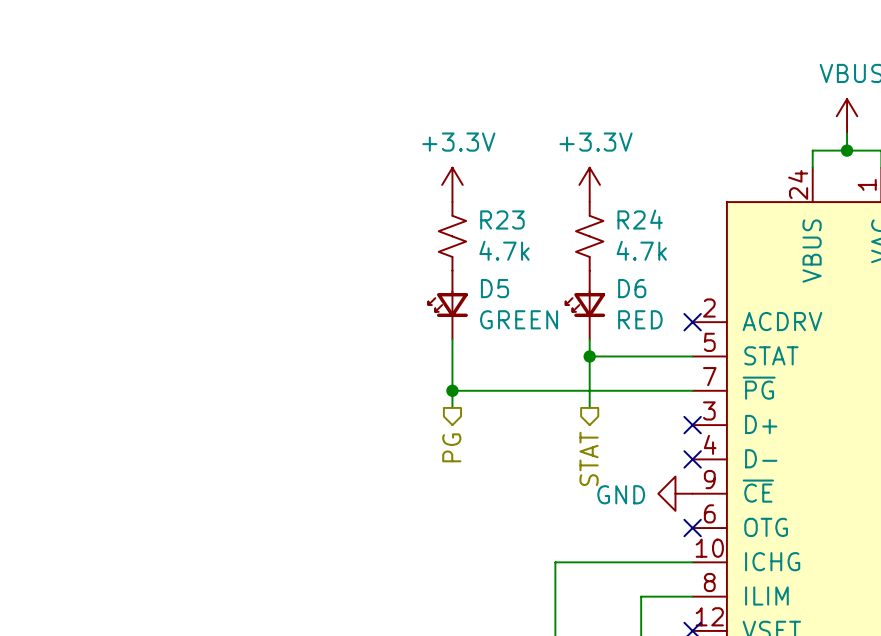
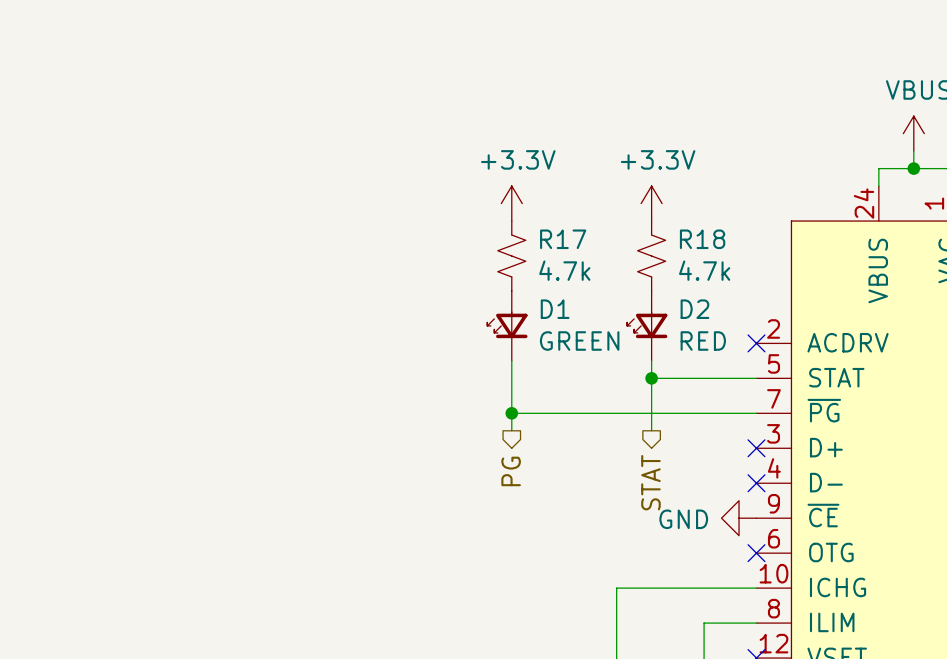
R23 name: R23 (502, 219) -> R17 (563, 239)
R24 name: R24 (640, 219) -> R18 (702, 239)
D5 name: D5 (494, 288) -> D1 (555, 309)
D6 name: D6 (632, 288) -> D2 (694, 309)

